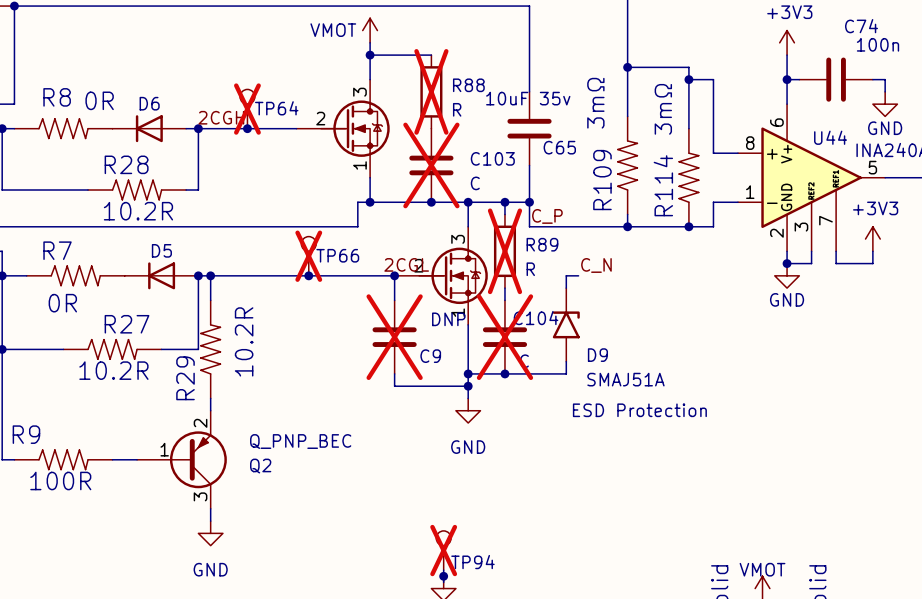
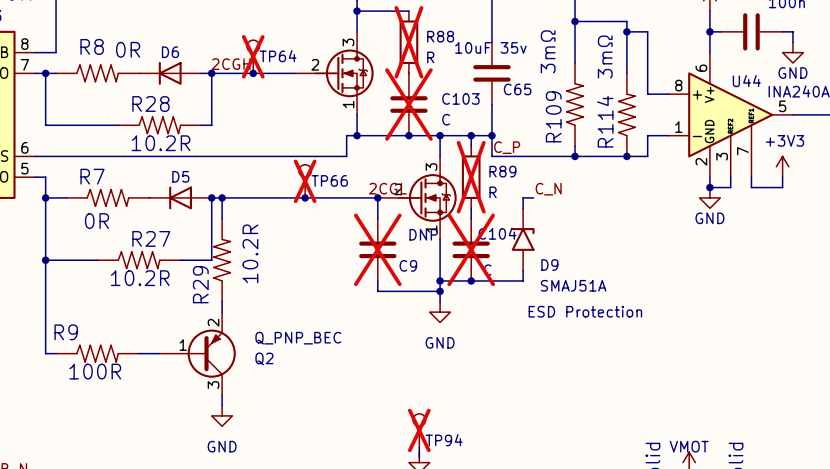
junction: (443, 576) -> none

